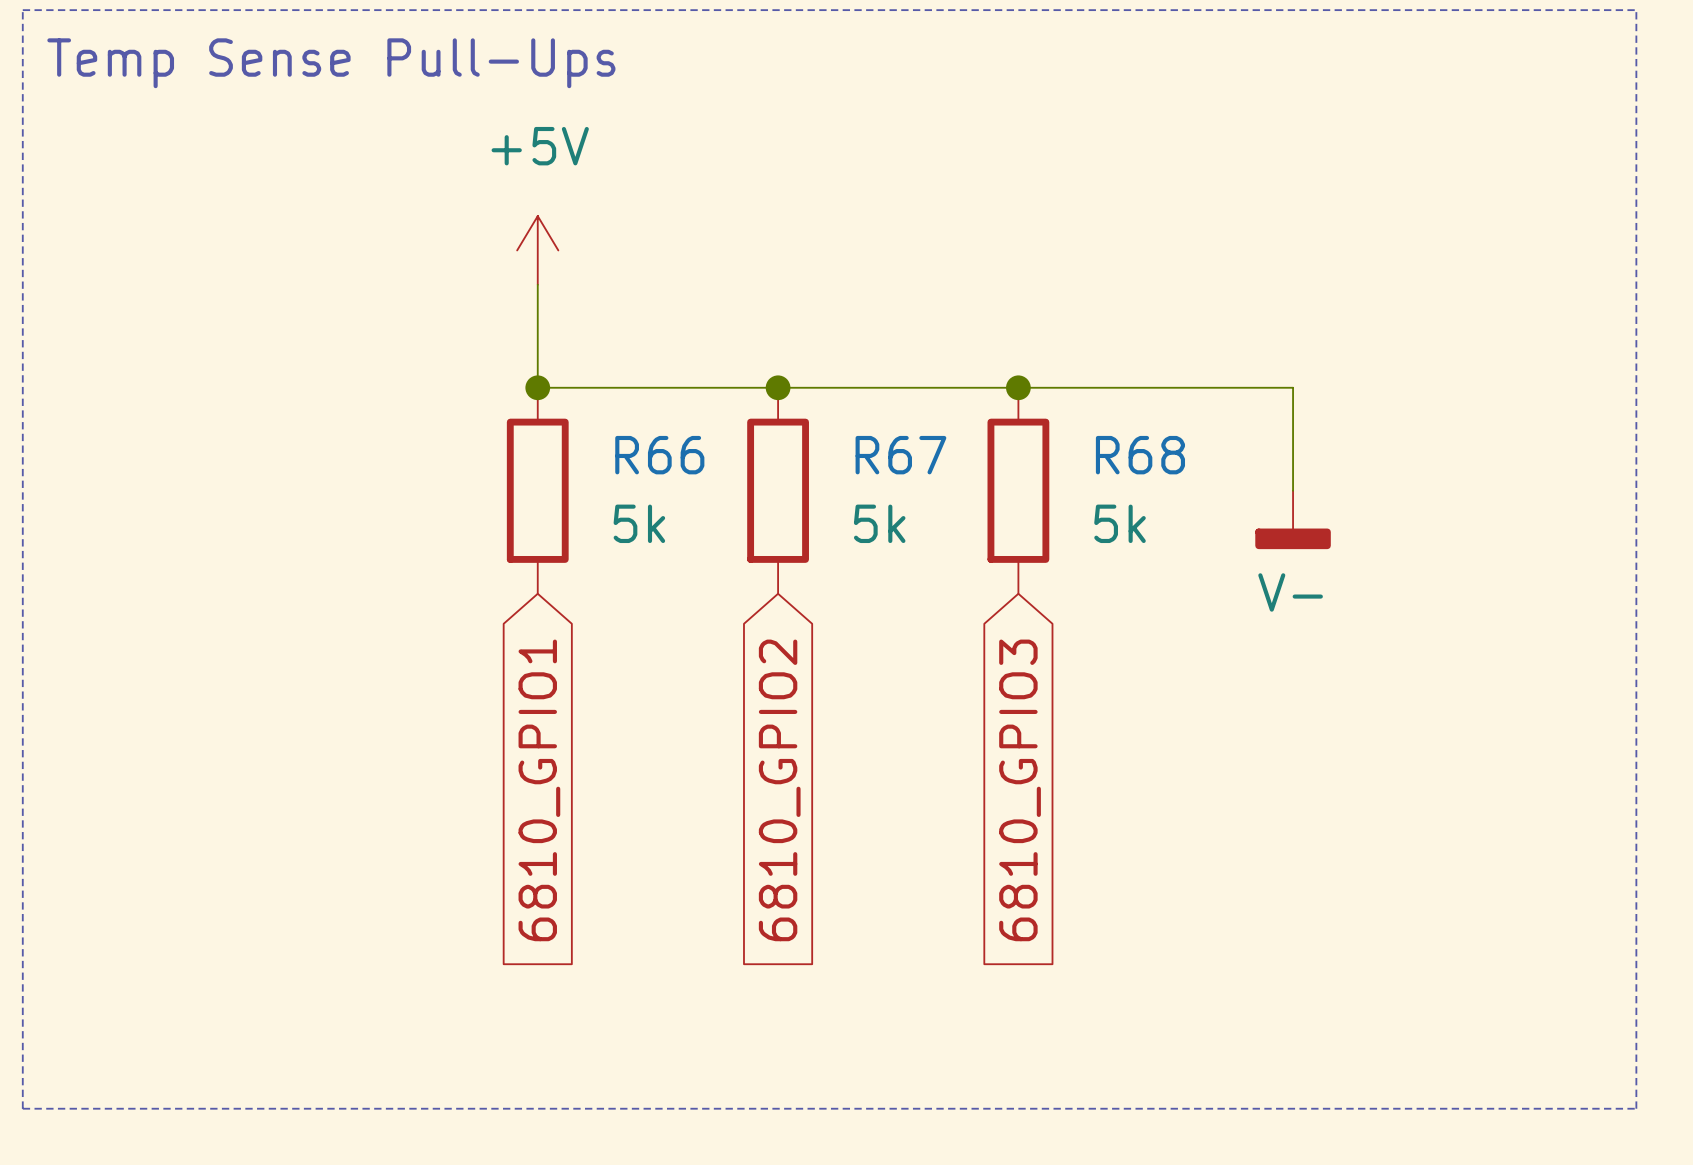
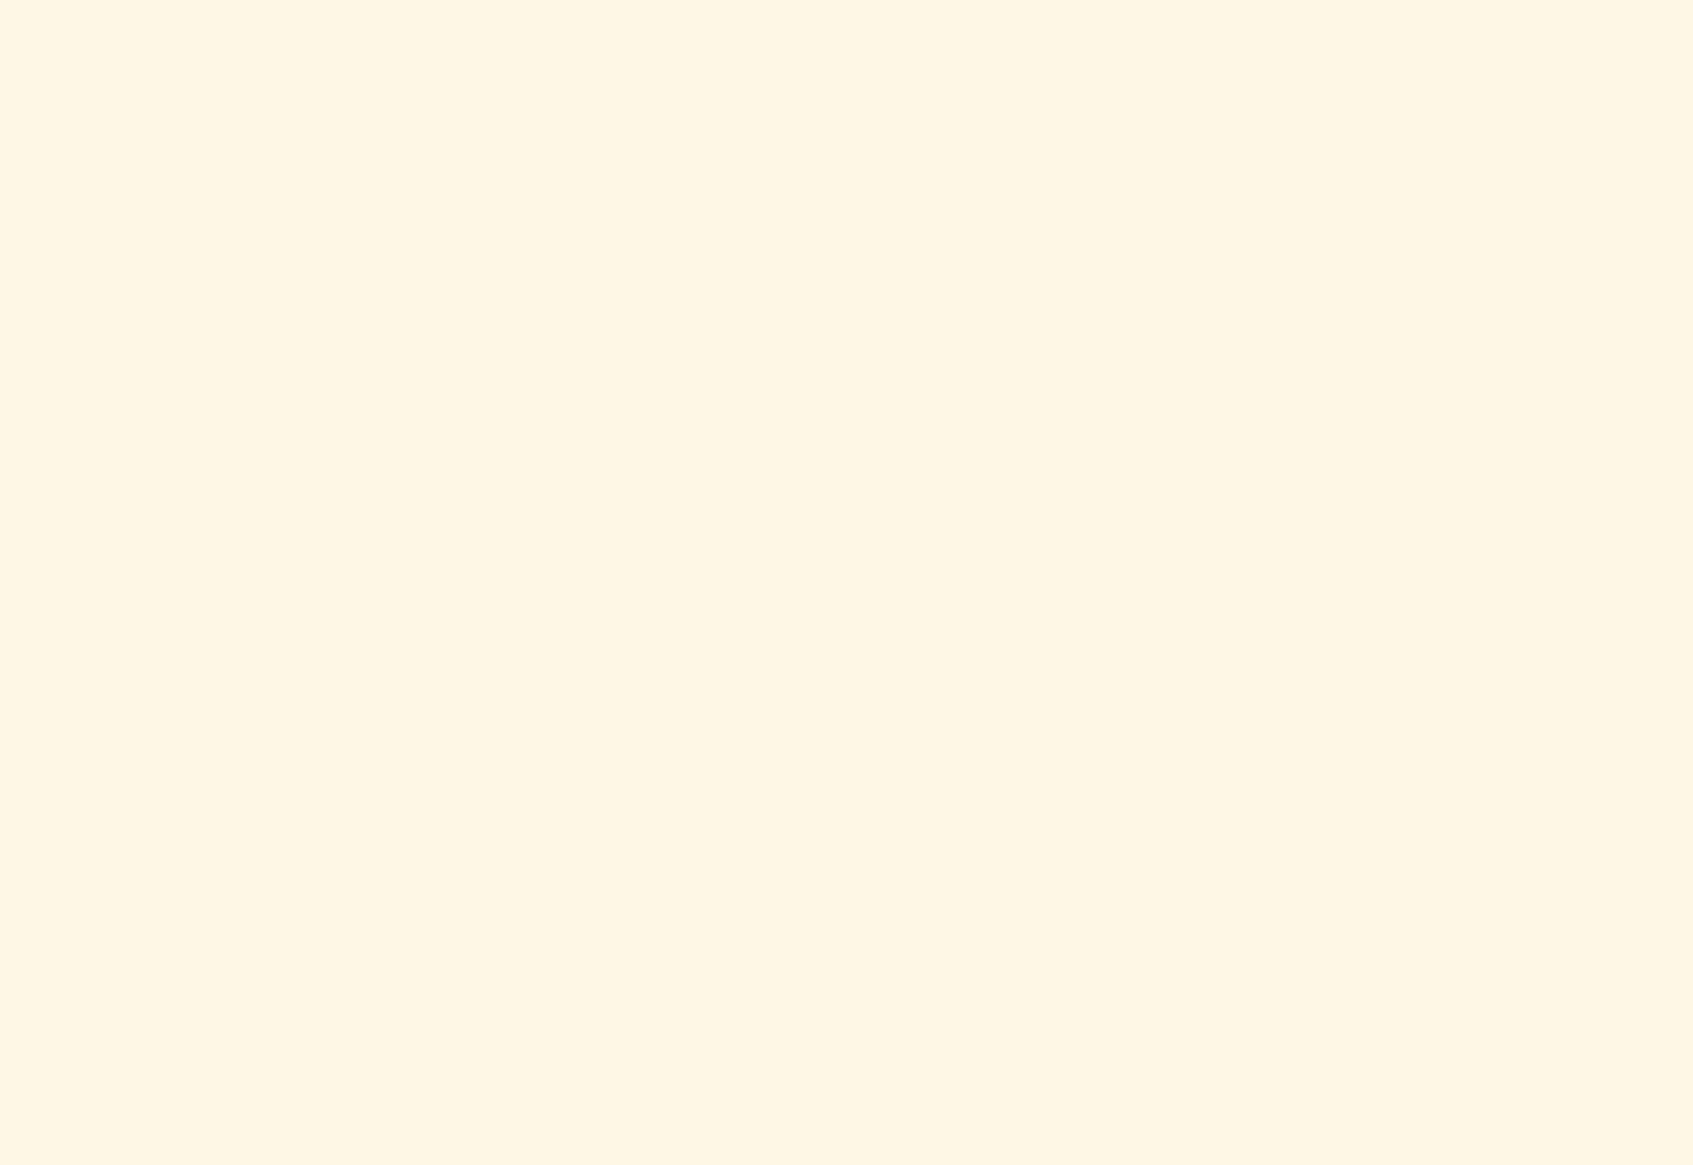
line: (22, 10) (1636, 10) (1636, 1108) (22, 1108) (22, 10) -> none
text: Temp Sense Pull-Ups (331, 63) -> none
power symbol: +5V (537, 250) -> none
wire: (537, 284) (537, 387) (1293, 387) (1293, 490) -> none
junction: (537, 387) -> none
junction: (778, 387) -> none
junction: (1018, 387) -> none
R66: 5k (537, 490) -> none
R67: 5k (778, 490) -> none
R68: 5k (1018, 490) -> none
power symbol: V- (1293, 519) -> none
global label: 6810_GPIO1 (539, 790) -> none
global label: 6810_GPIO2 (779, 790) -> none
global label: 6810_GPIO3 (1020, 790) -> none

